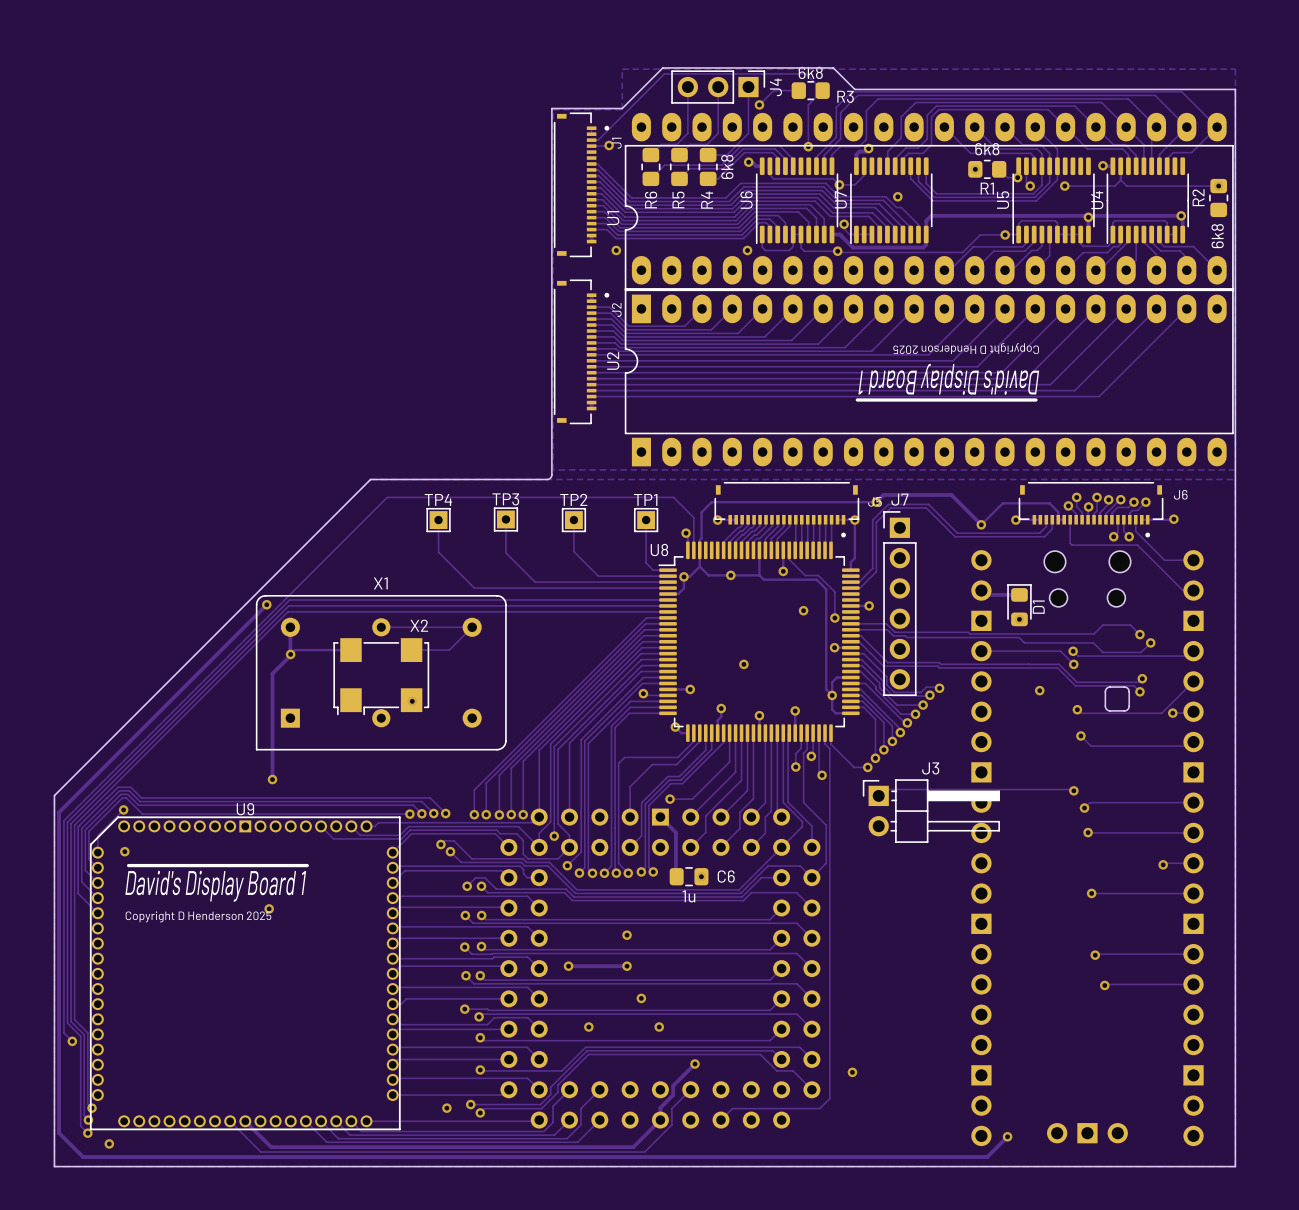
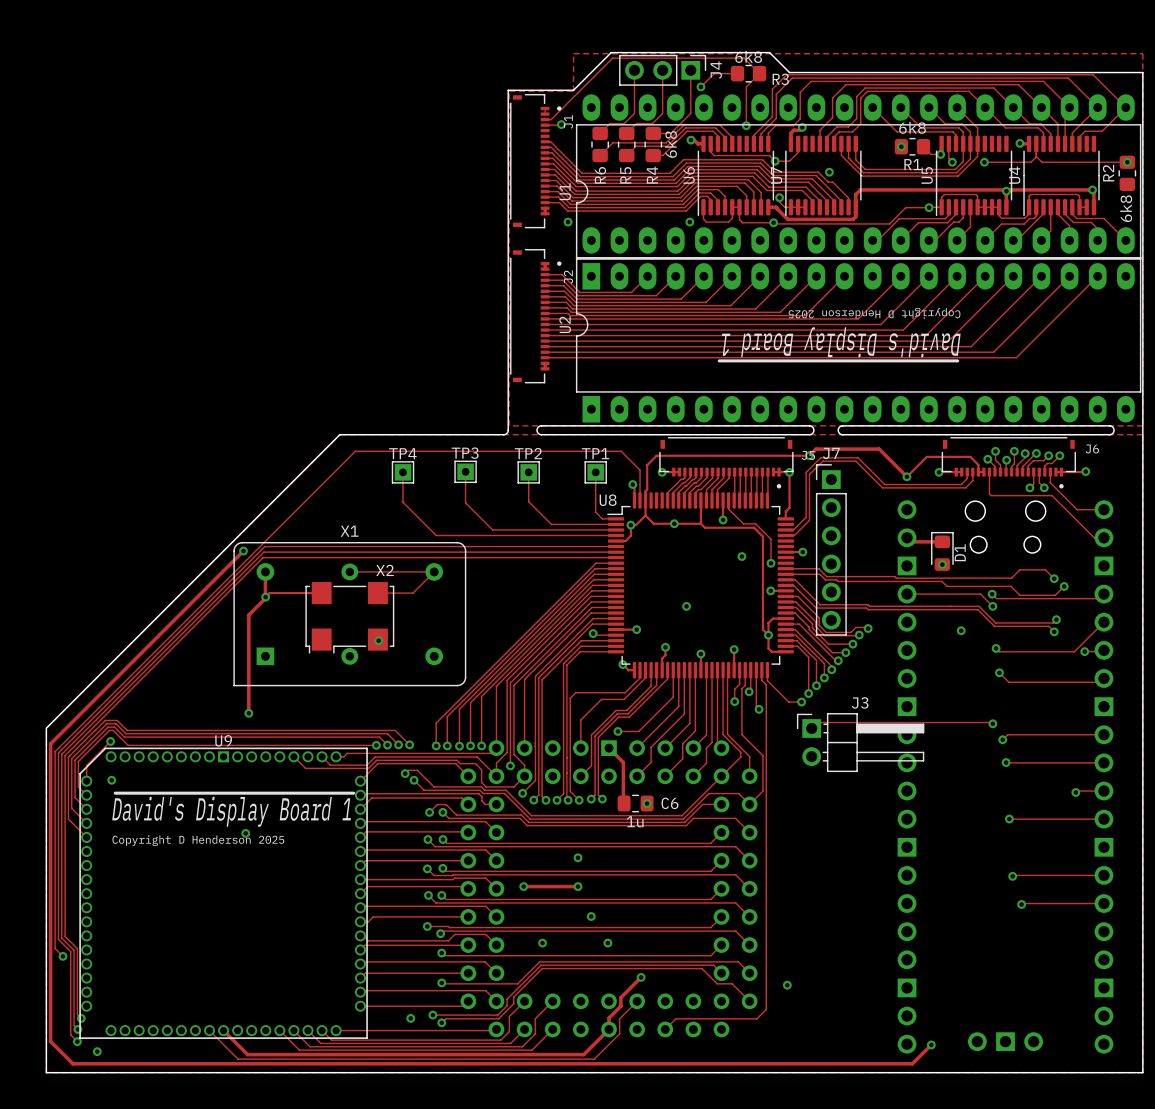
board edge: none -> (541, 425) (809, 425) (813, 430) (809, 434) (541, 434) (537, 430) (541, 425)
board edge: none -> (842, 425) (1109, 425) (1114, 430) (1109, 434) (842, 434) (838, 430) (842, 425)
board edge: (1110, 687) (1128, 688) (1129, 706) (1127, 709) (1110, 710) (1106, 709) (1105, 691) (1110, 687) -> none

